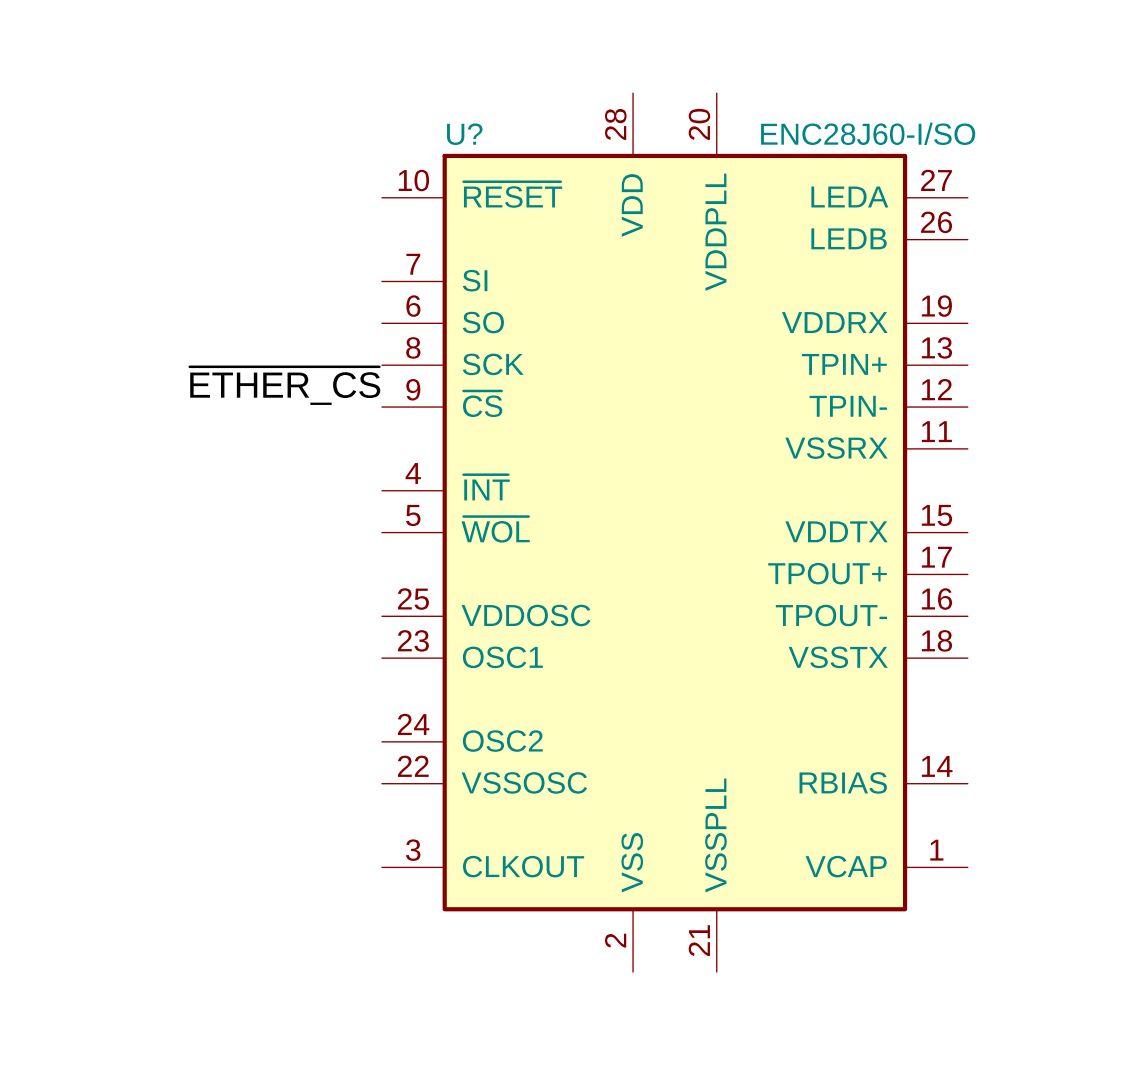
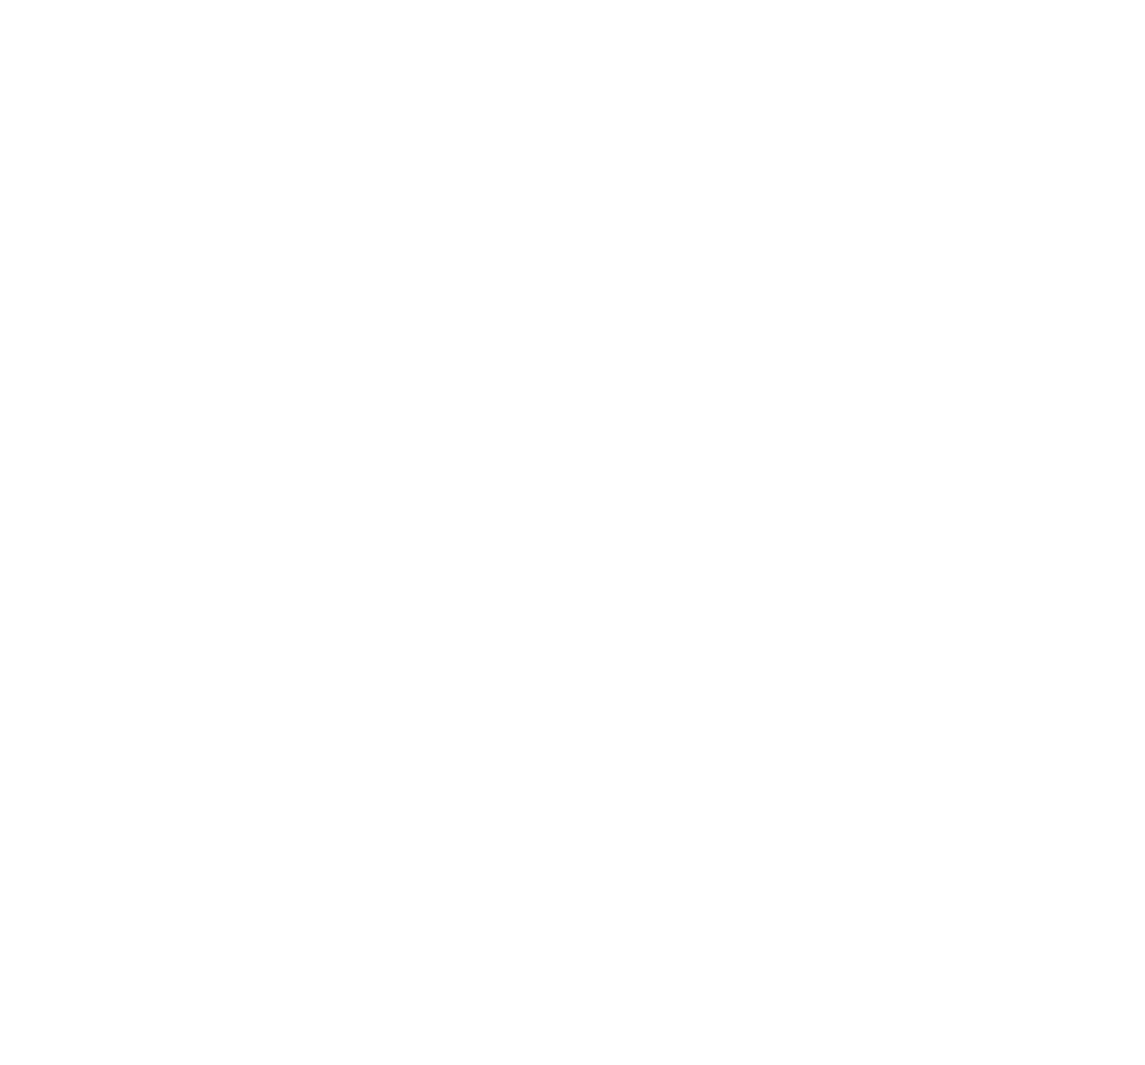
label: ~{ETHER_CS} (284, 385) -> none
U?: ENC28J60-I/SO (674, 532) -> none

